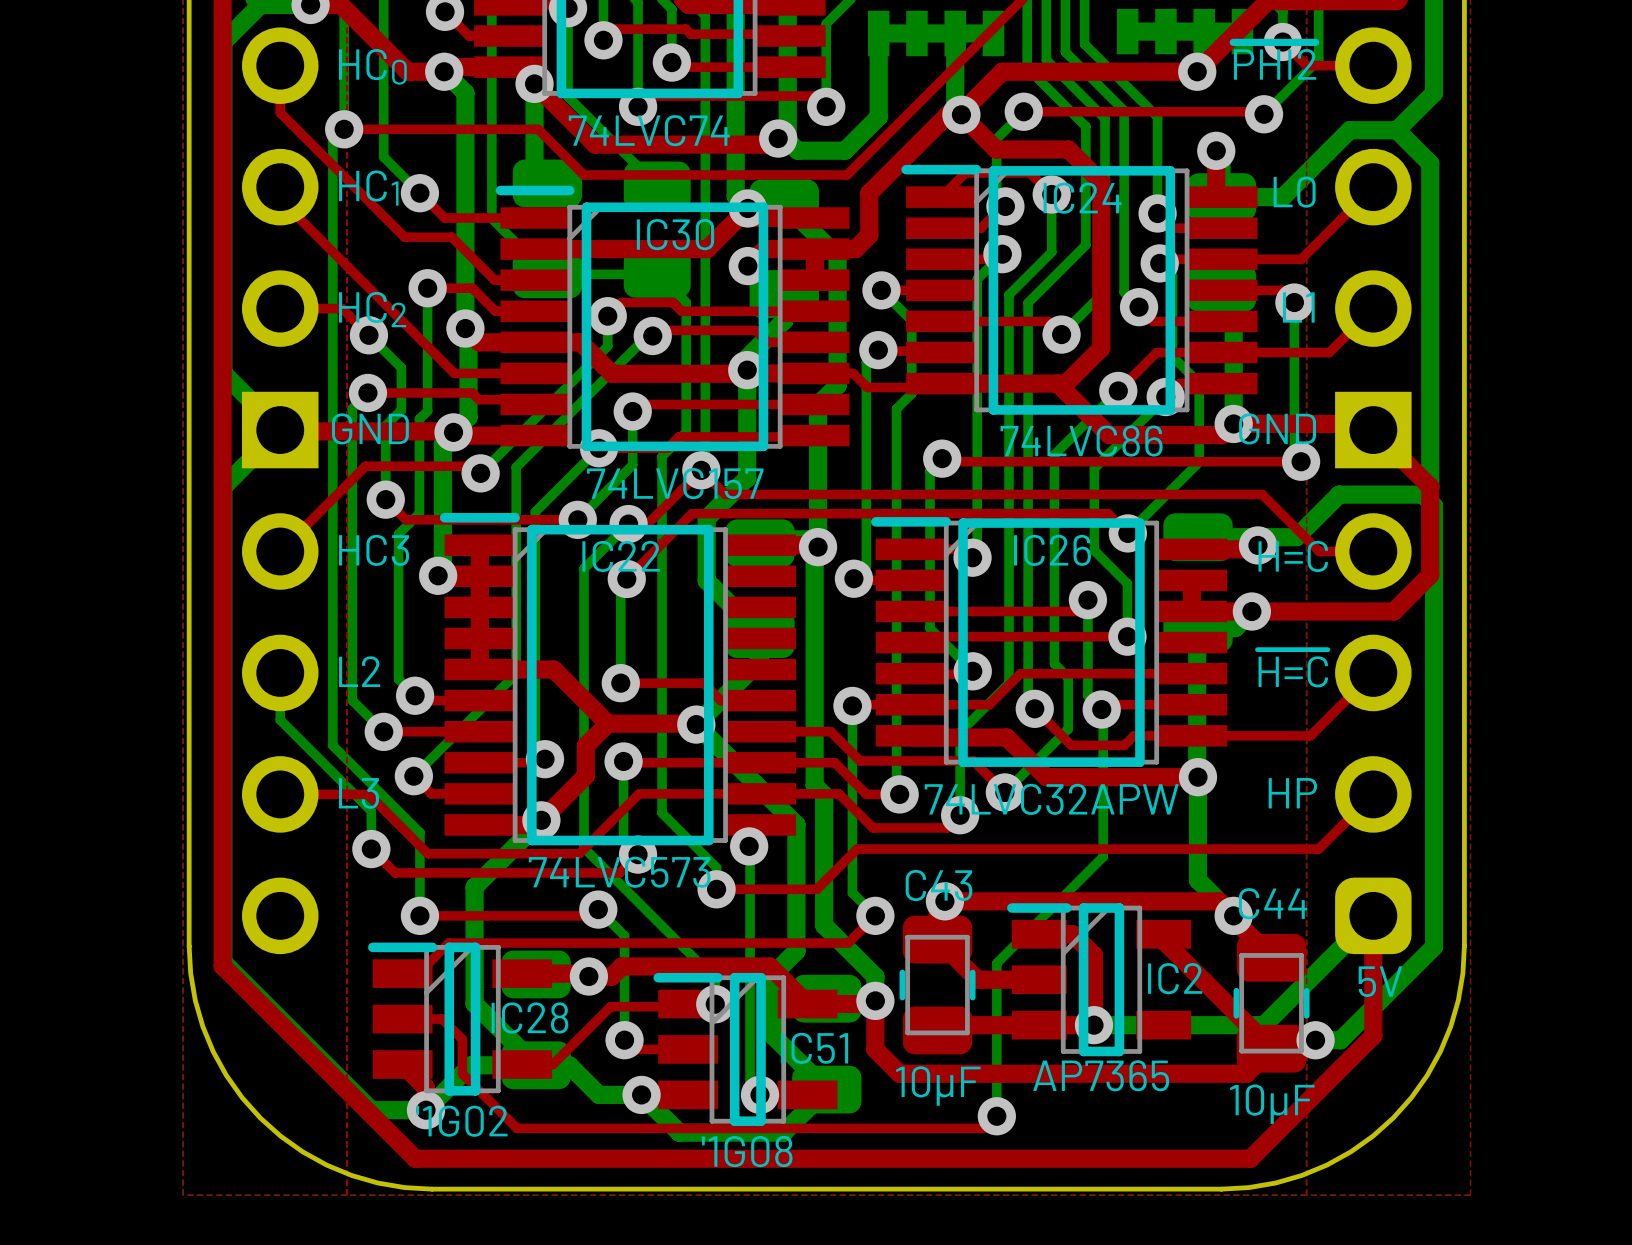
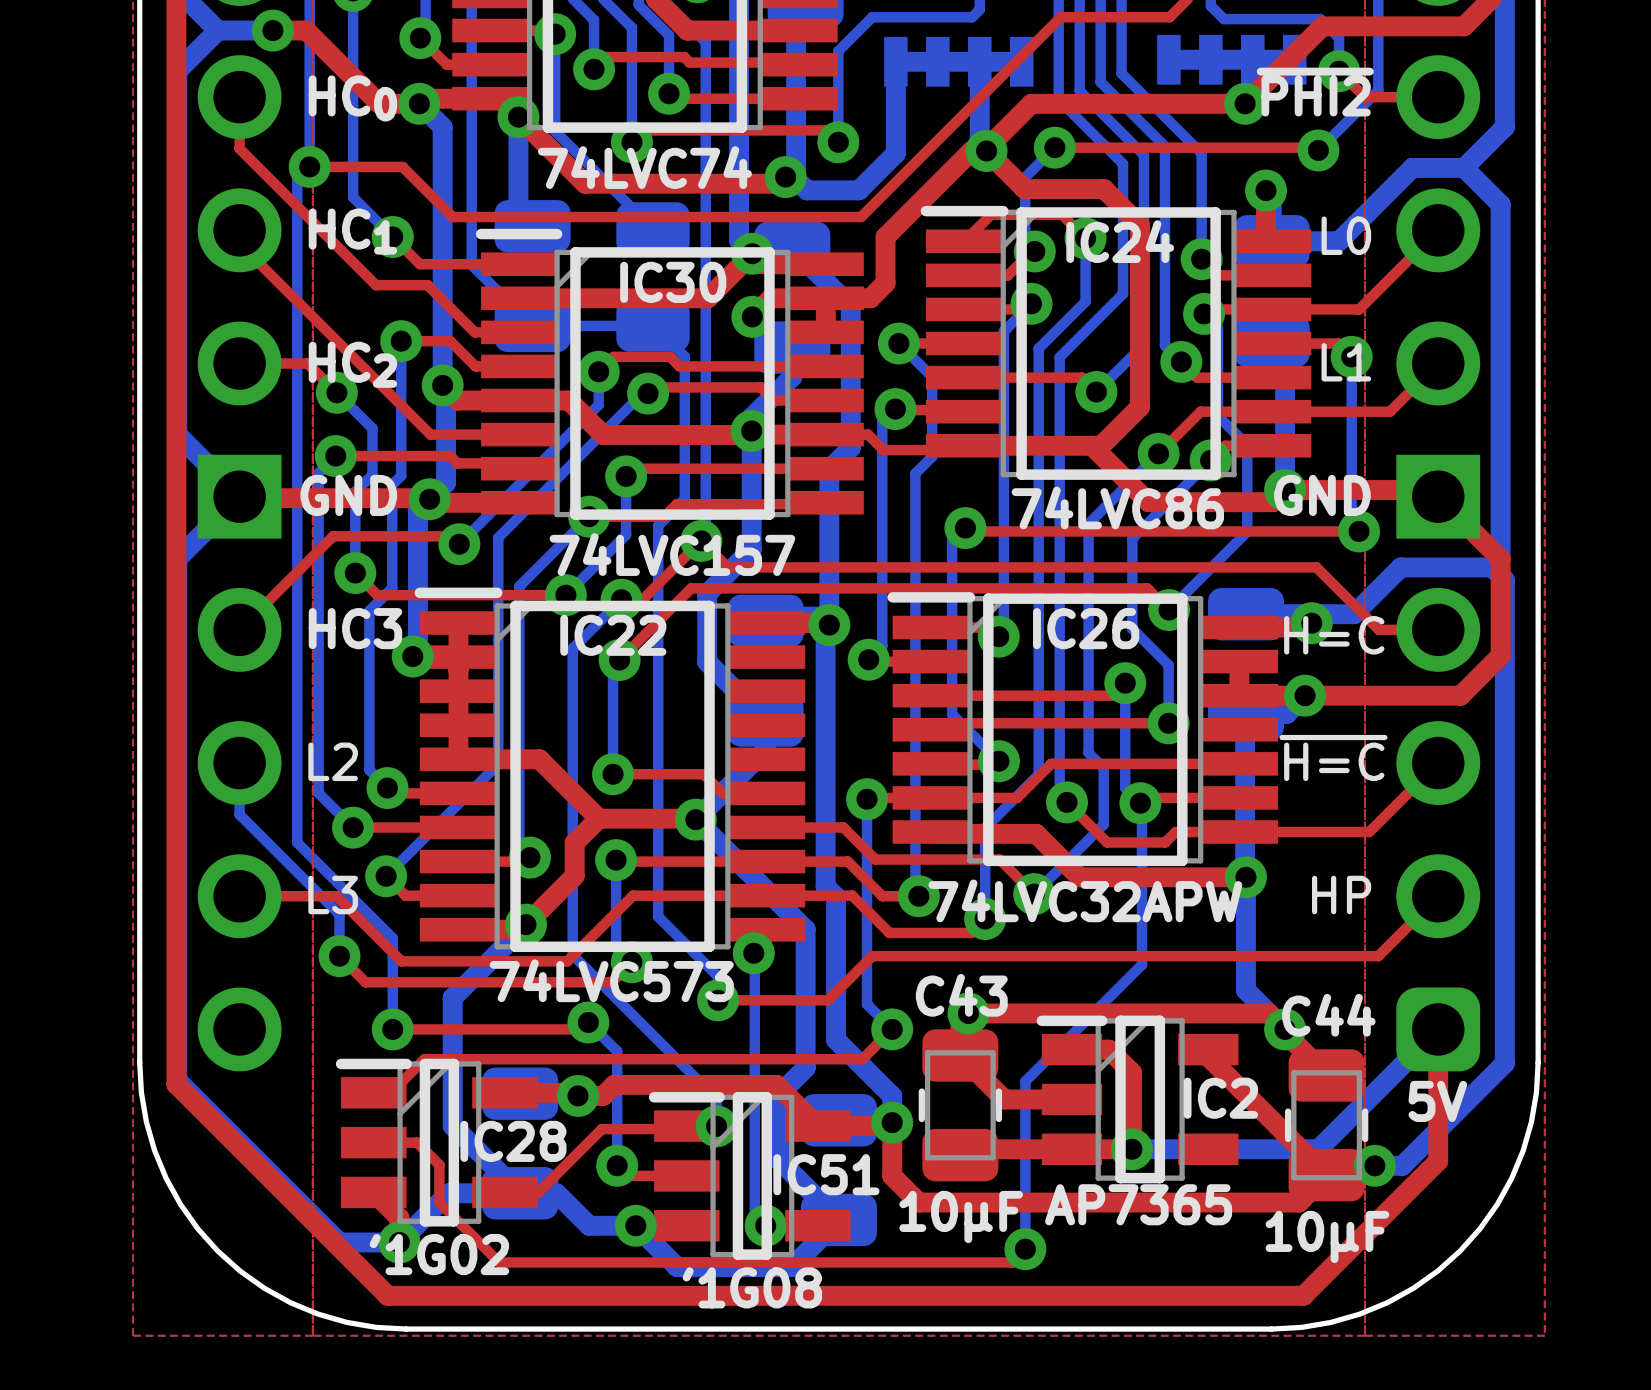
top track: (428, 129) (538, 129) (583, 174) -> (402, 166) (452, 217) (572, 217)

